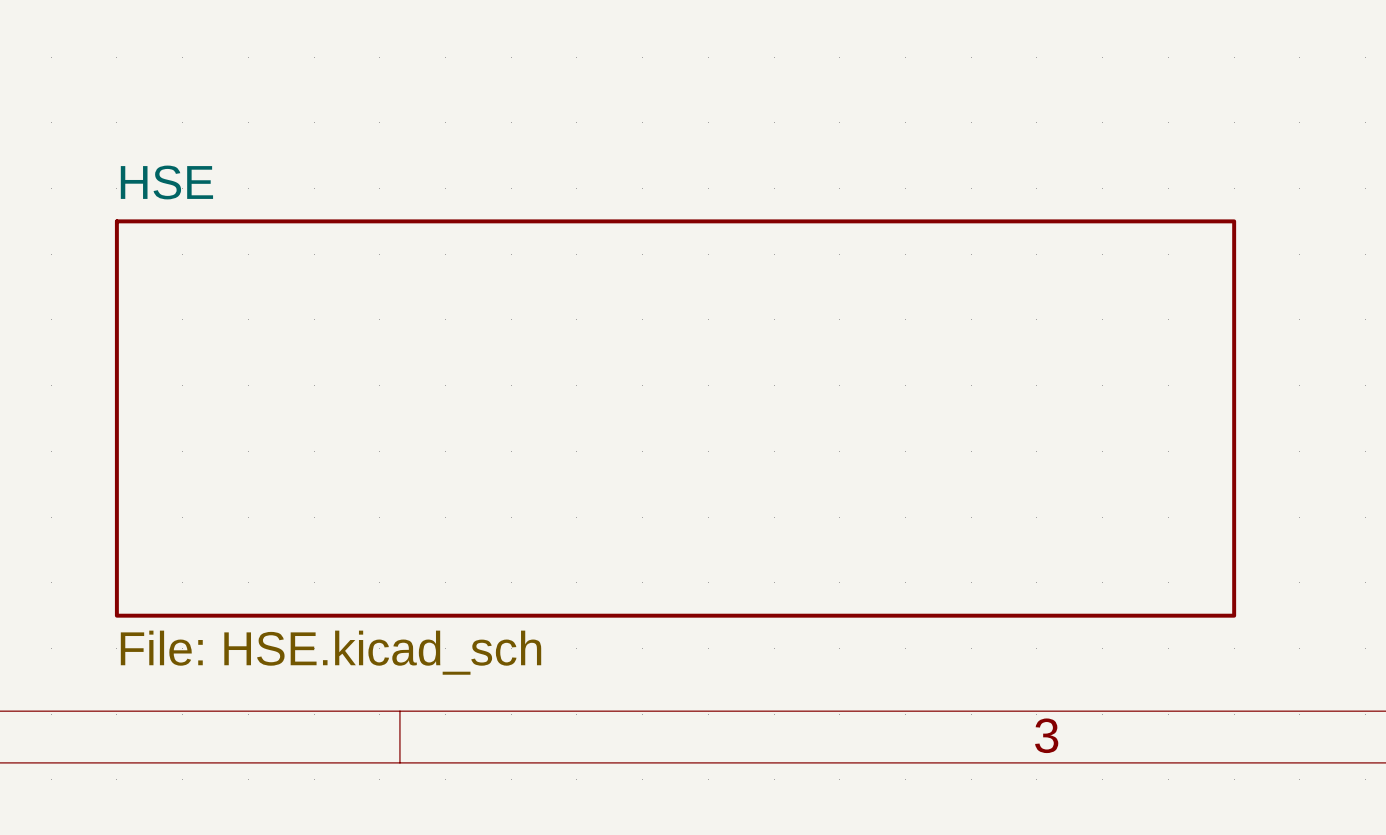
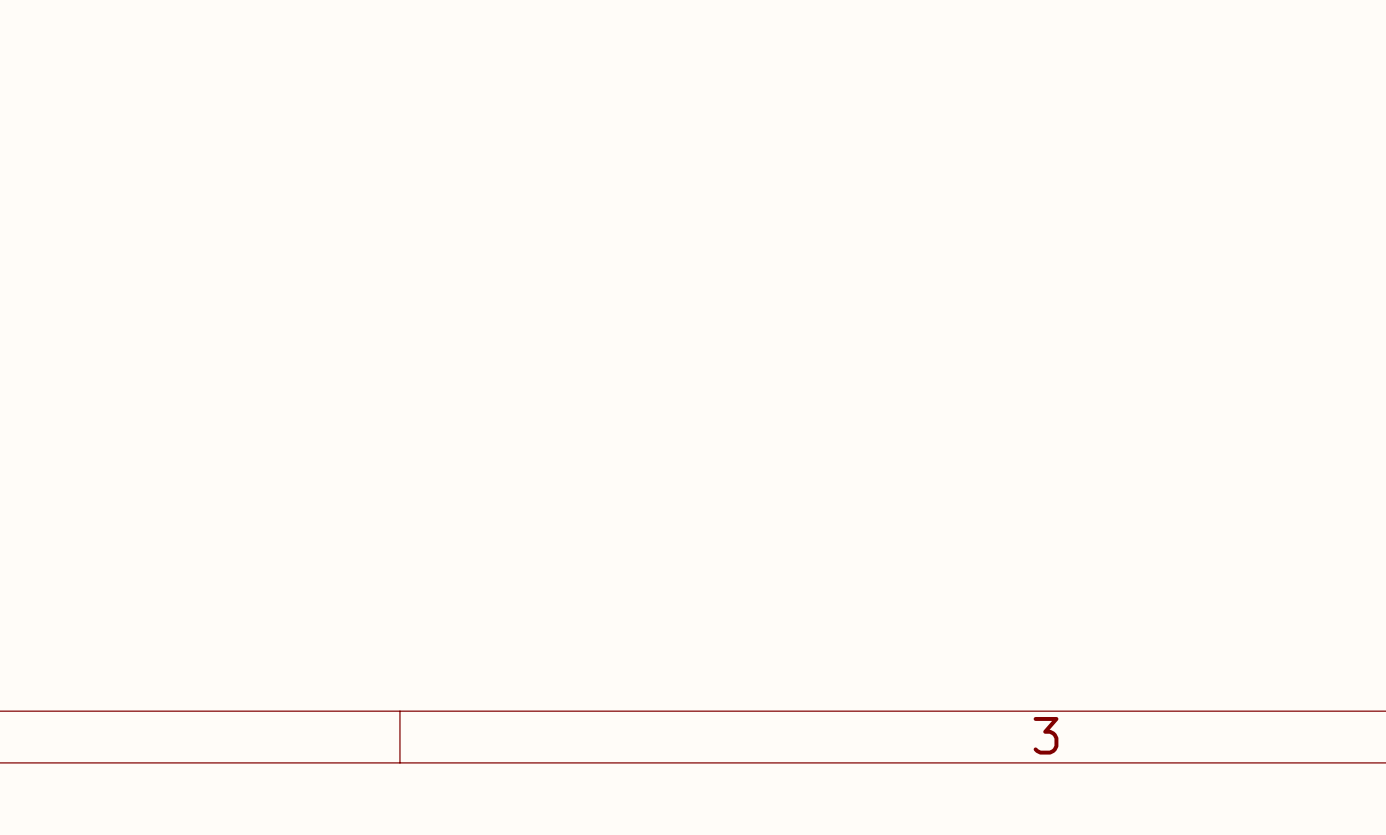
sheet HSE: File: HSE.kicad_sch (675, 418) -> none

